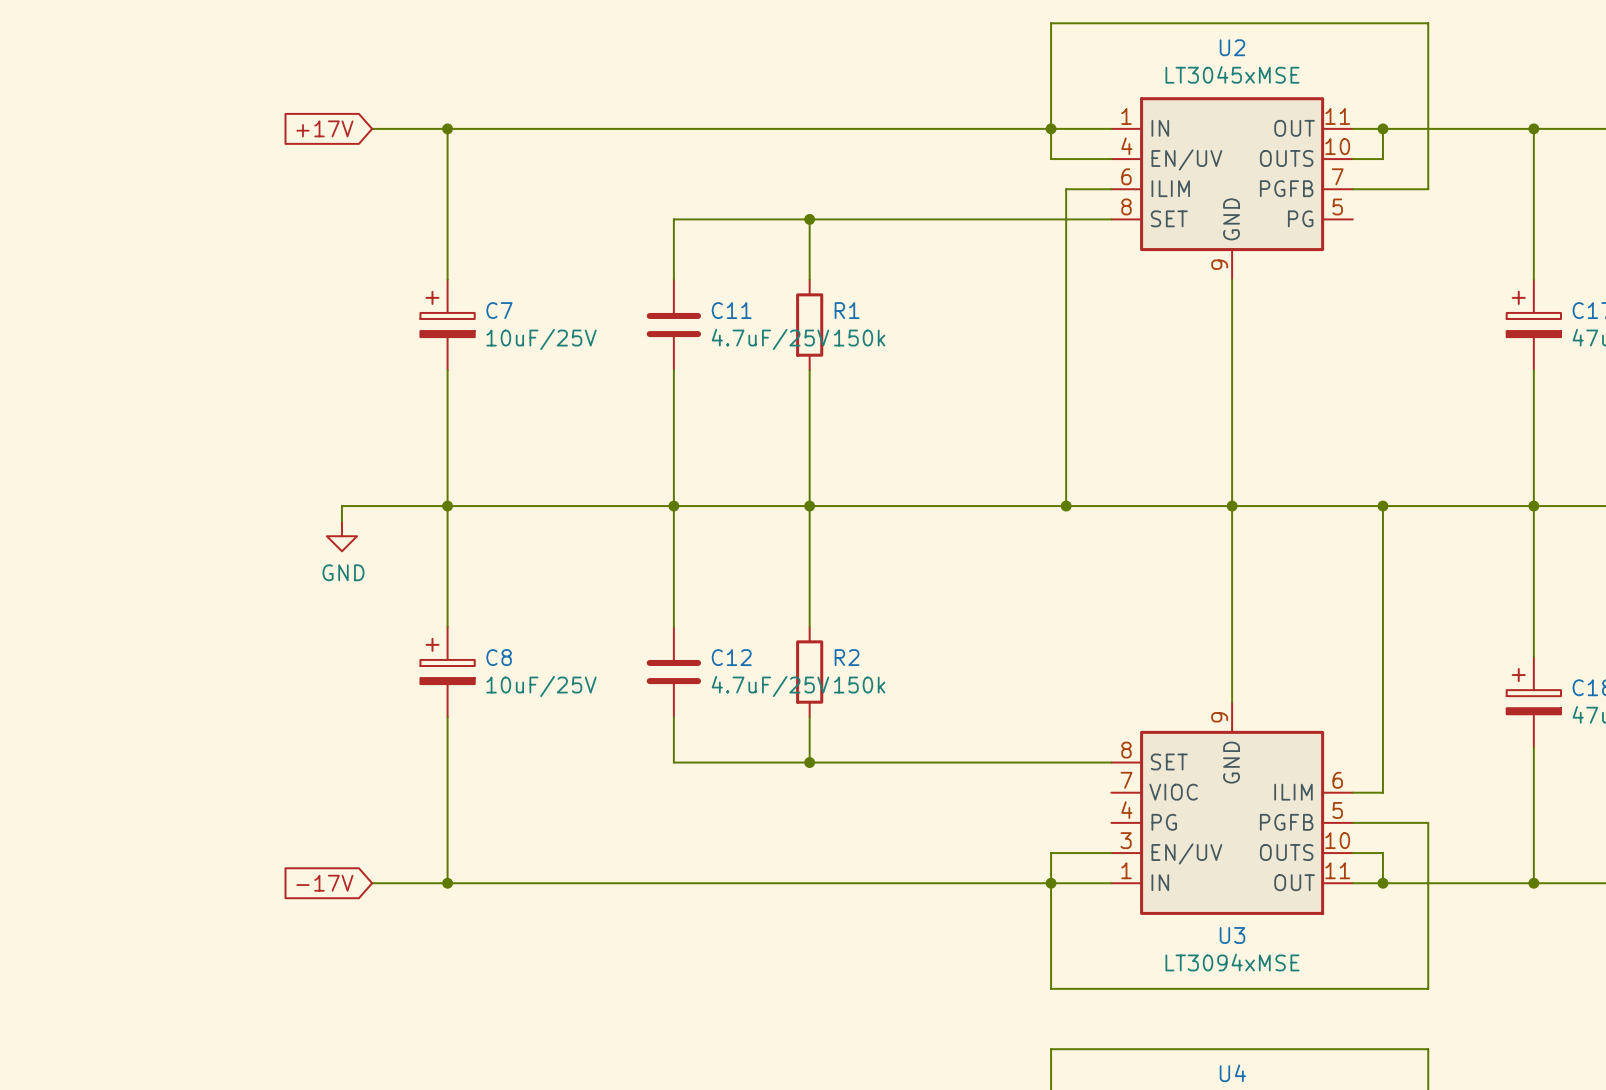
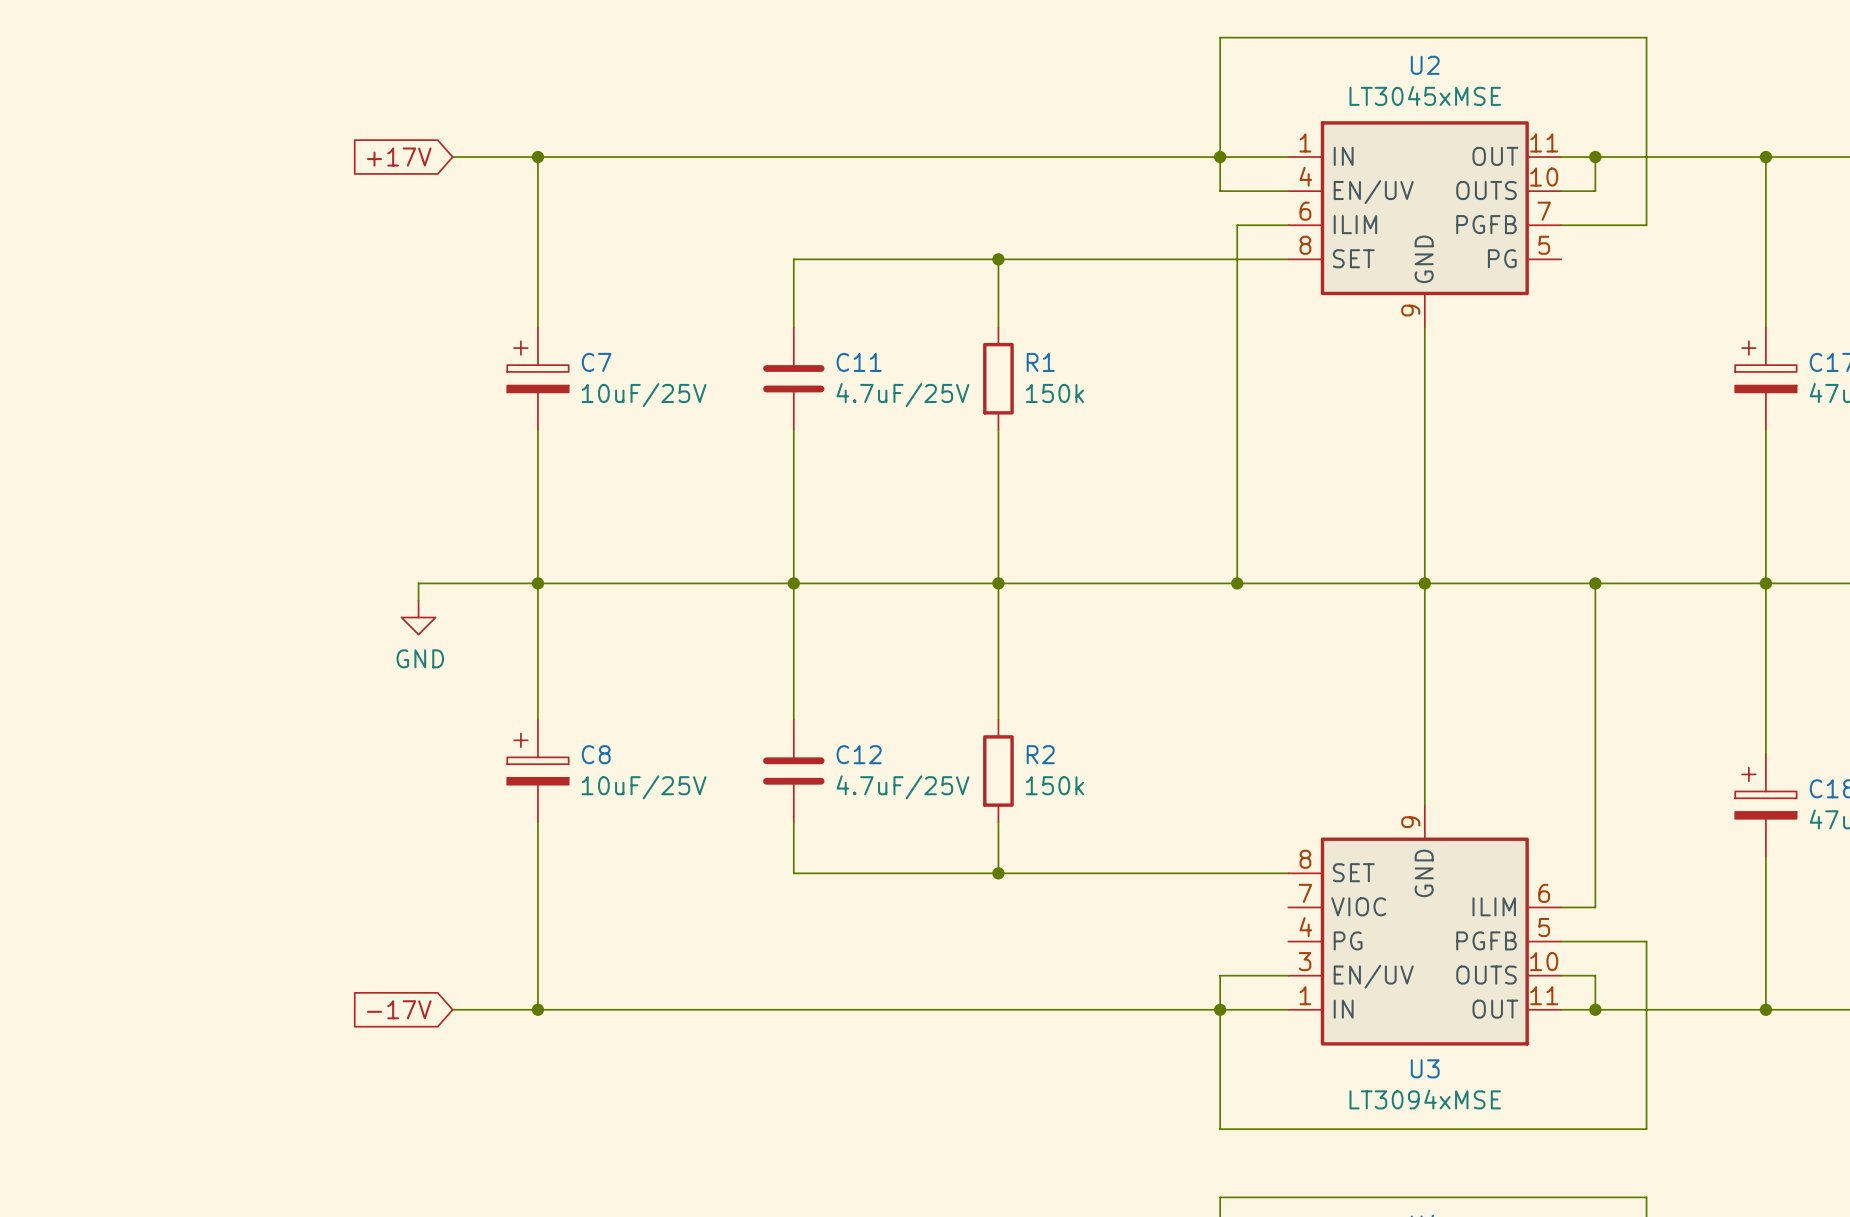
wire: (809, 219) (809, 279) -> (998, 259) (998, 327)
junction position: (809, 219) -> (998, 259)
R1 position: (809, 325) -> (998, 378)
wire: (809, 370) (809, 626) -> (998, 429) (998, 719)
junction position: (809, 506) -> (998, 583)
R2 position: (809, 672) -> (998, 771)
wire: (809, 717) (809, 762) -> (998, 822) (998, 873)
junction position: (809, 762) -> (998, 873)

